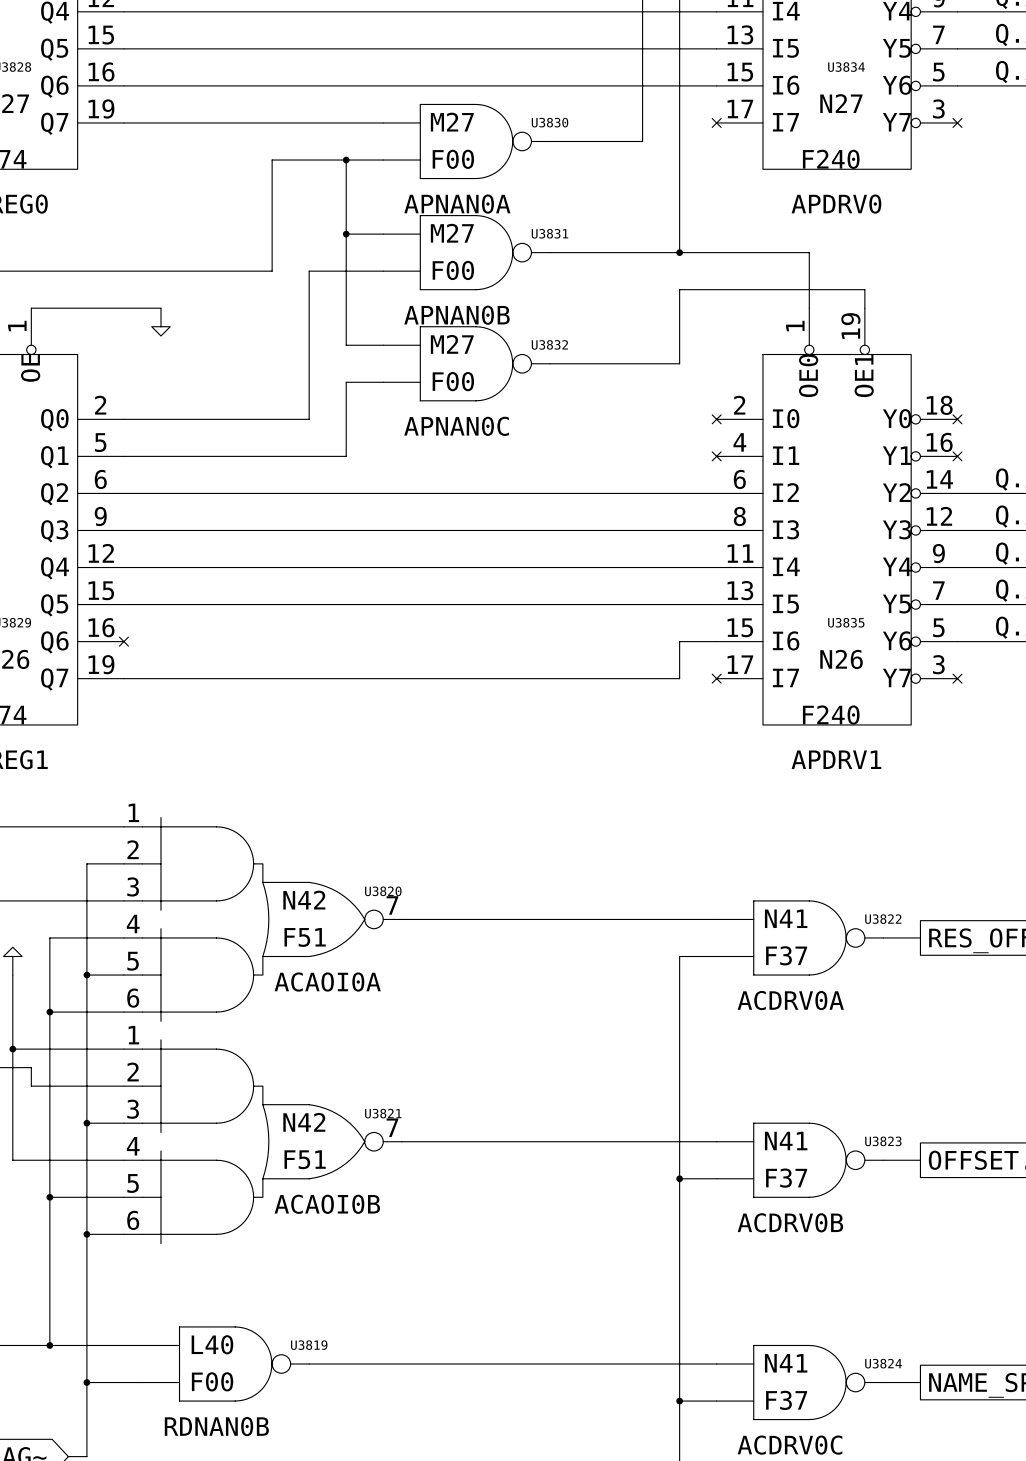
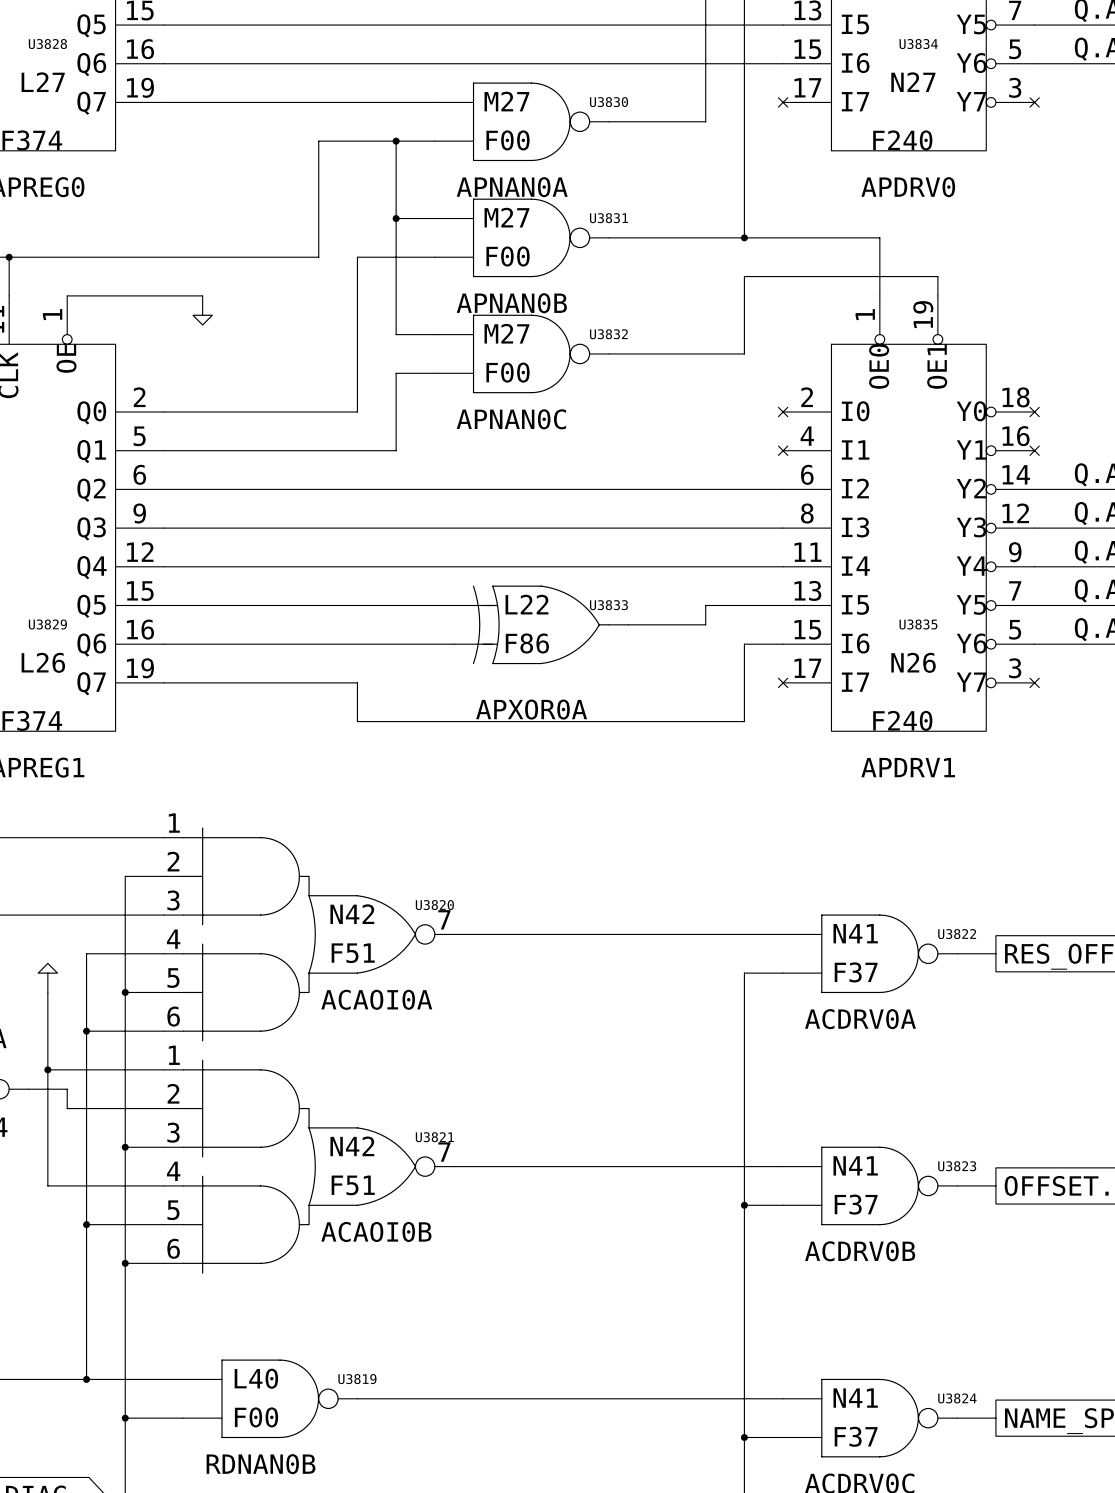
wire: (401, 604) (642, 604) -> (628, 624) (705, 624) (705, 605)
U3833: none -> F86 (541, 624)
wire: none -> (163, 644) (454, 644)
no-connect mark: (123, 641) -> none
wire: (309, 678) (679, 678) -> (357, 682) (357, 721) (744, 721) (744, 682)

